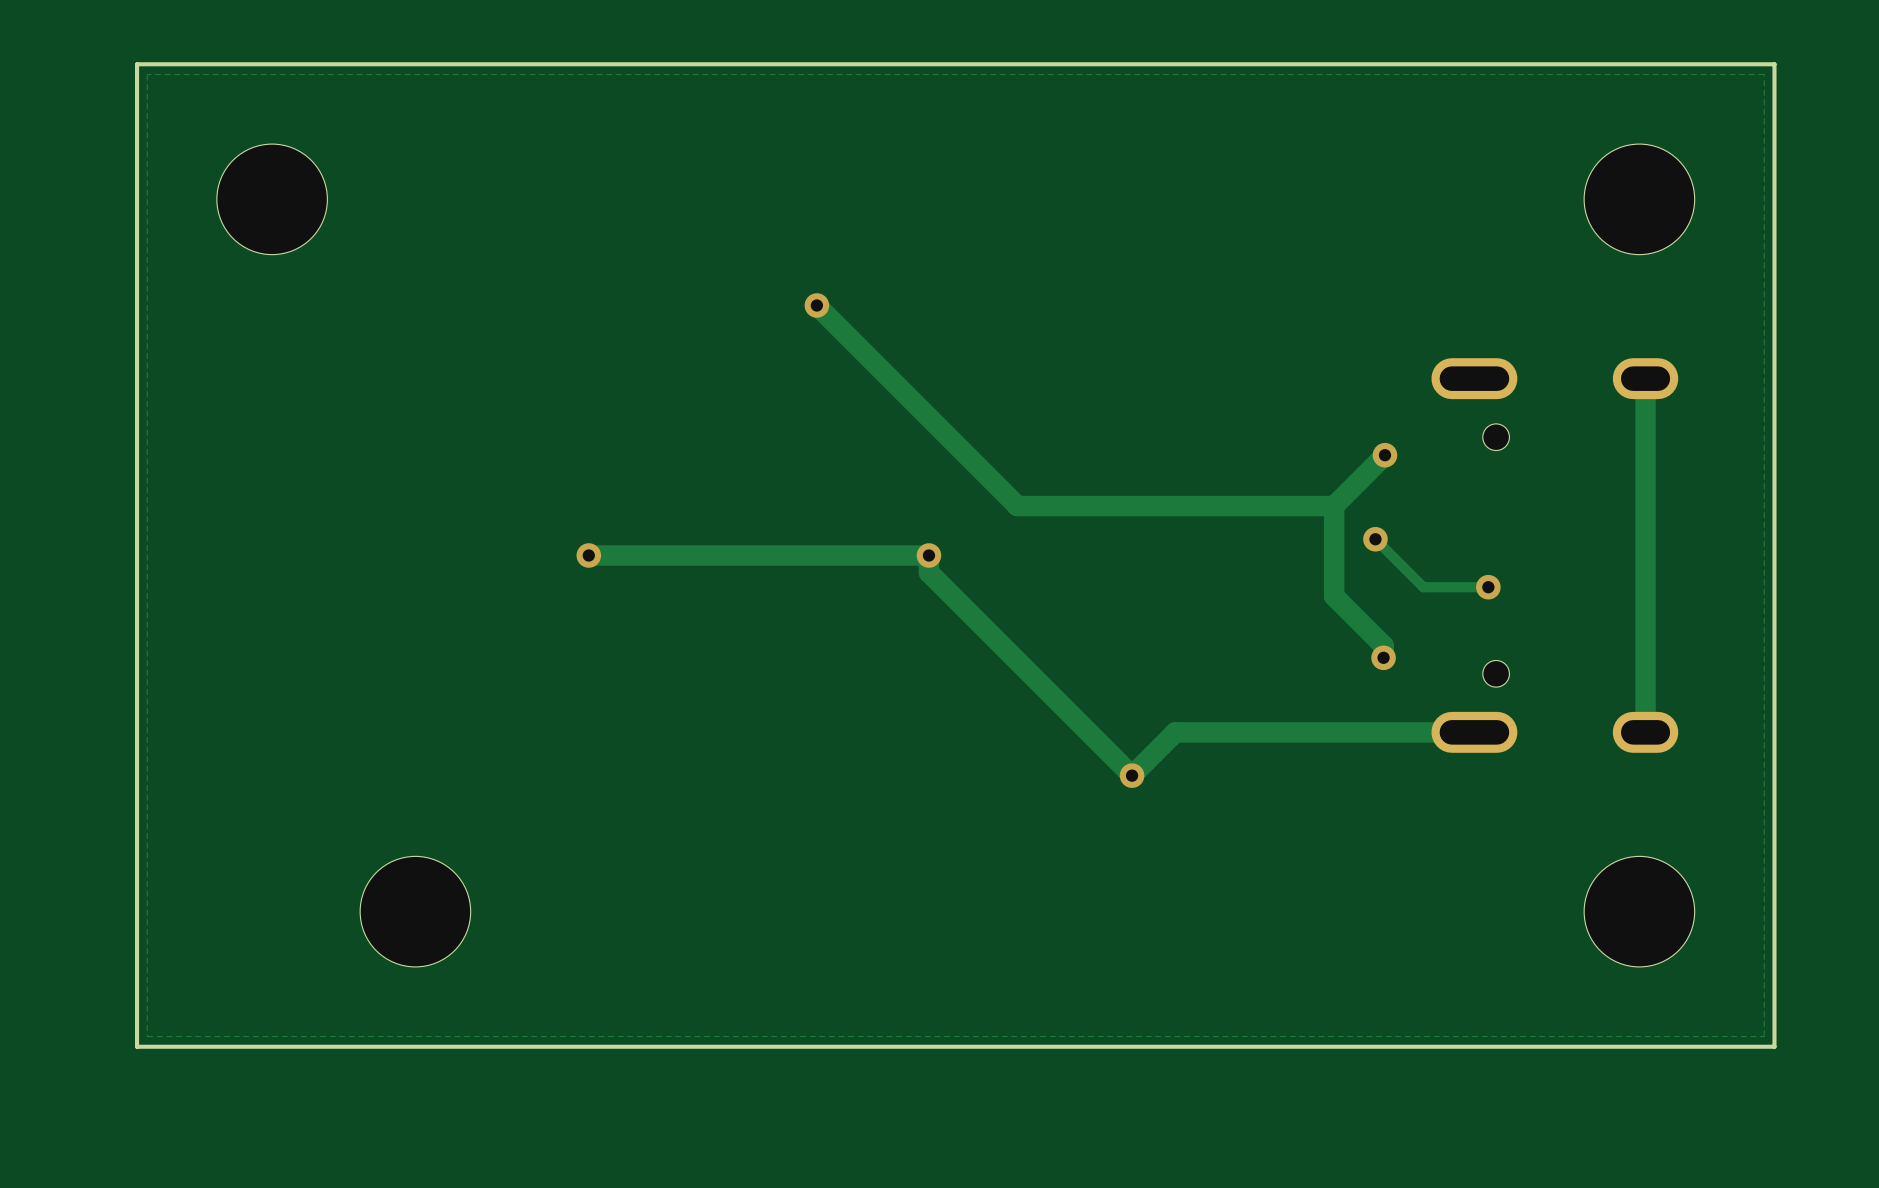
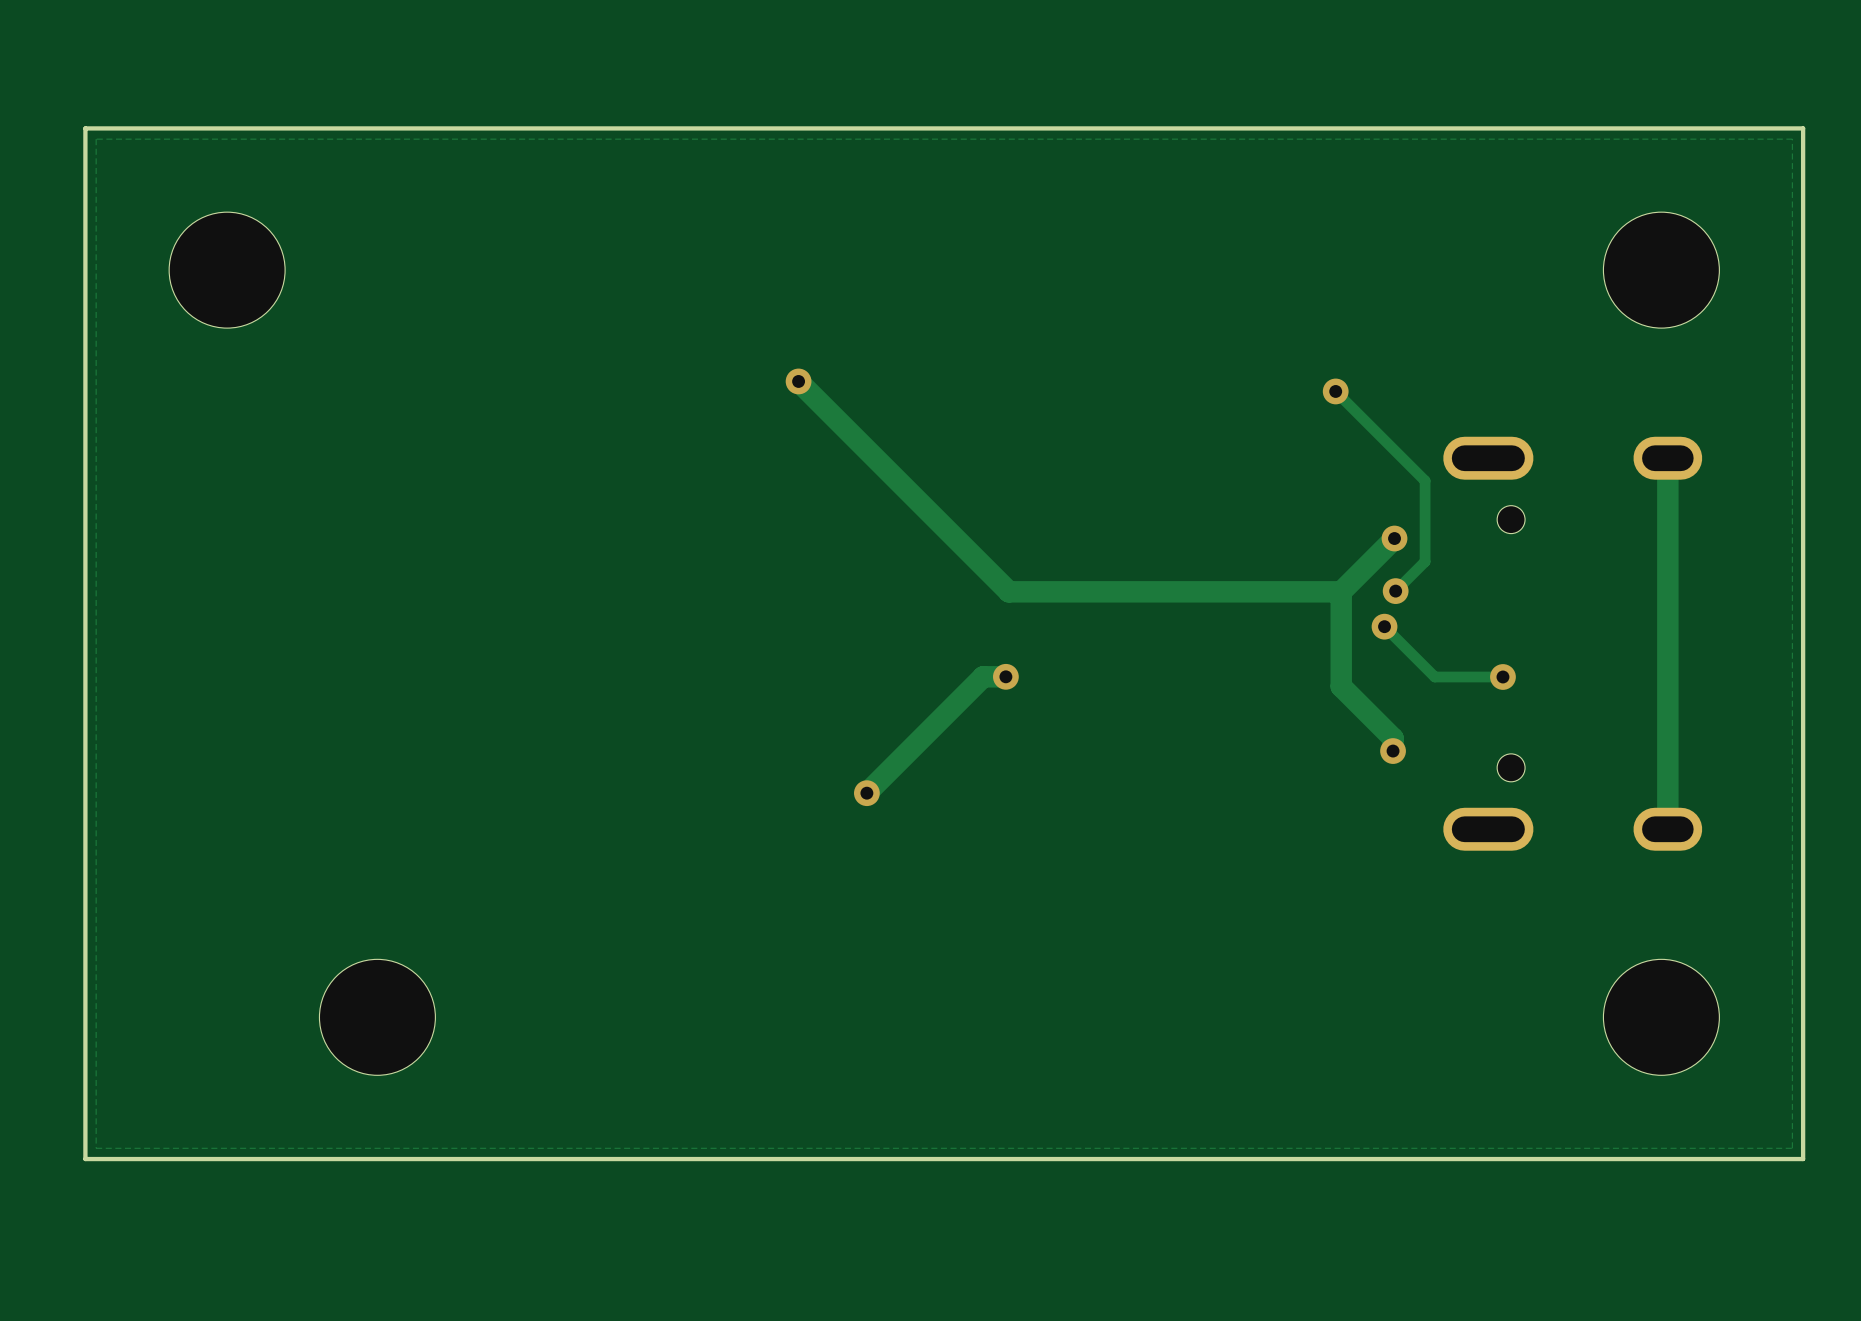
track: none -> (1335, 391) (1425, 480) (1425, 561) (1395, 591)
via: none -> (1335, 391)
via: none -> (1395, 591)
track: (588, 555) (928, 555) (928, 572) (1132, 775) (1175, 732) (1474, 732) -> none
via: (588, 555) -> none
via: (928, 555) -> none
track: none -> (1005, 676) (983, 676) (866, 793)
via: none -> (1005, 676)
via: none -> (866, 793)
via: (1132, 775) -> none

